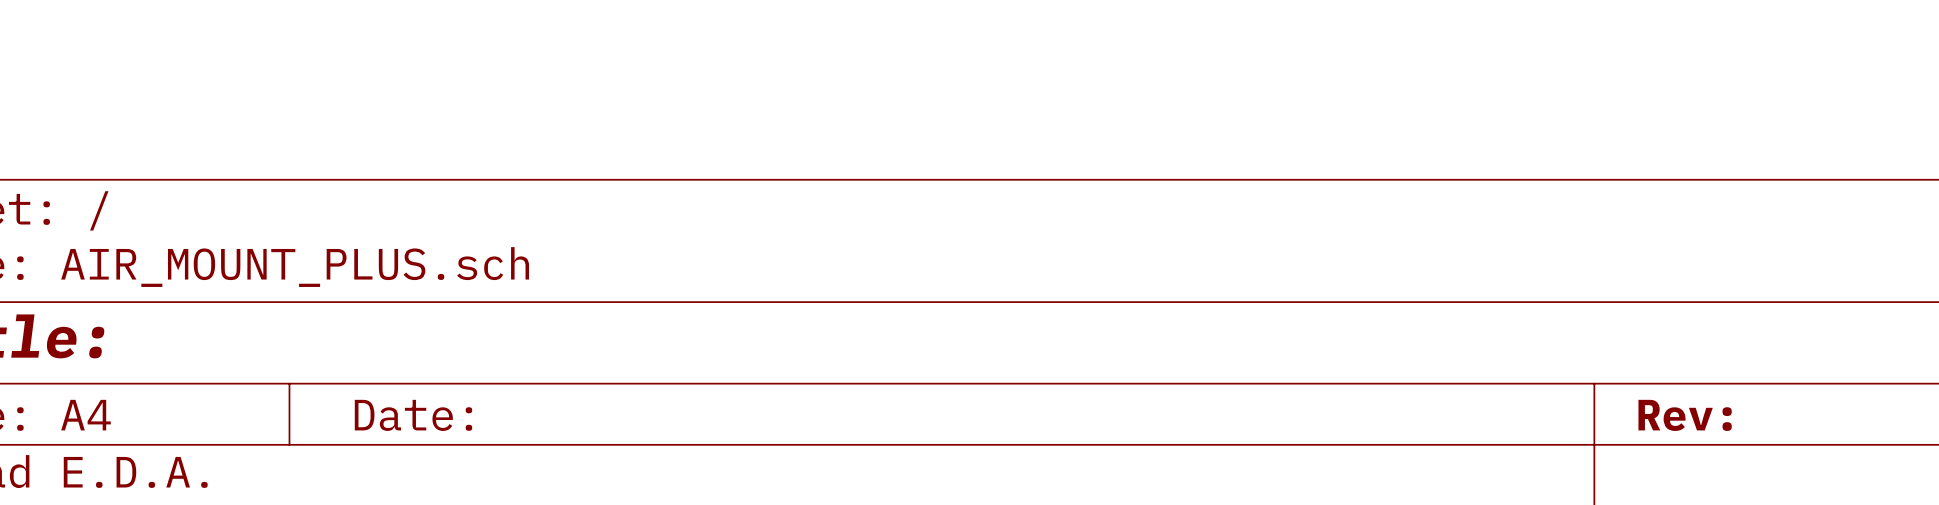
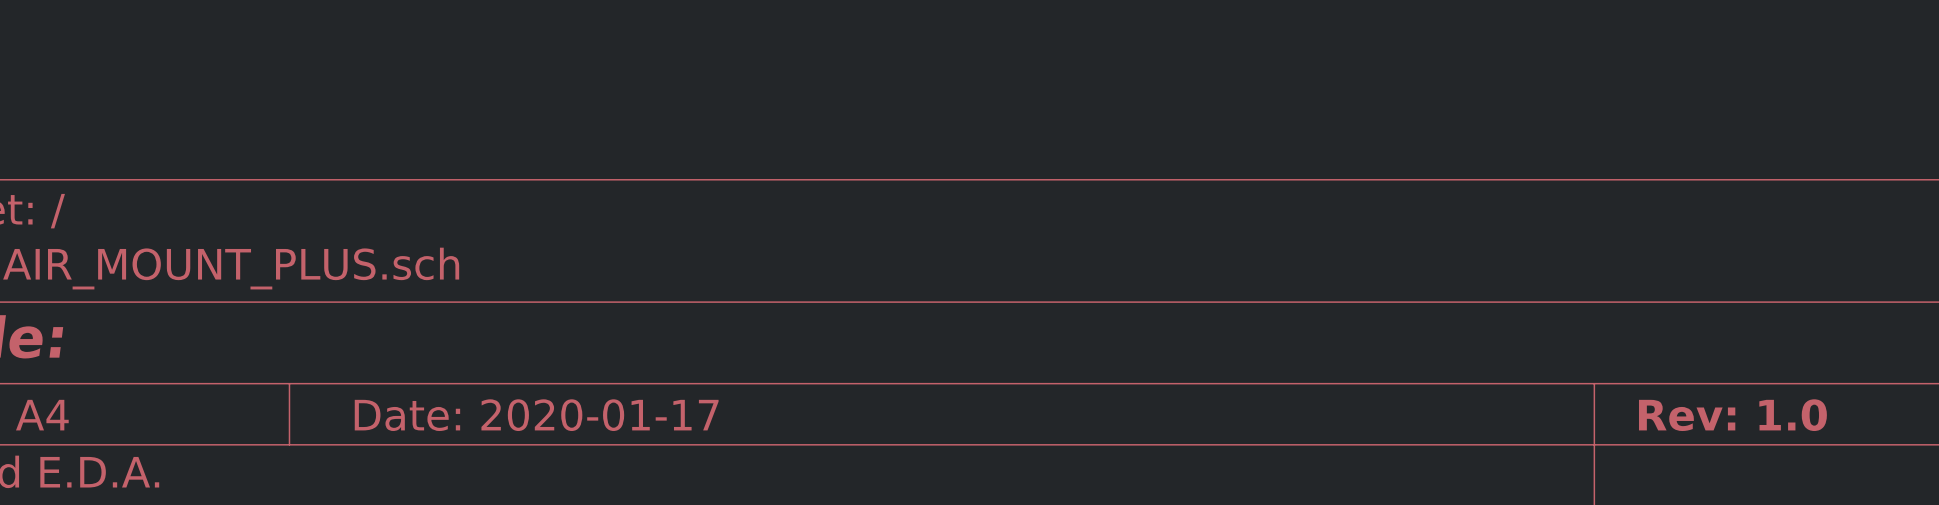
title block: Date: (413, 415) -> Date: 2020-01-17 (536, 415)
title block: Rev: (1685, 415) -> Rev: 1.0 (1732, 415)

